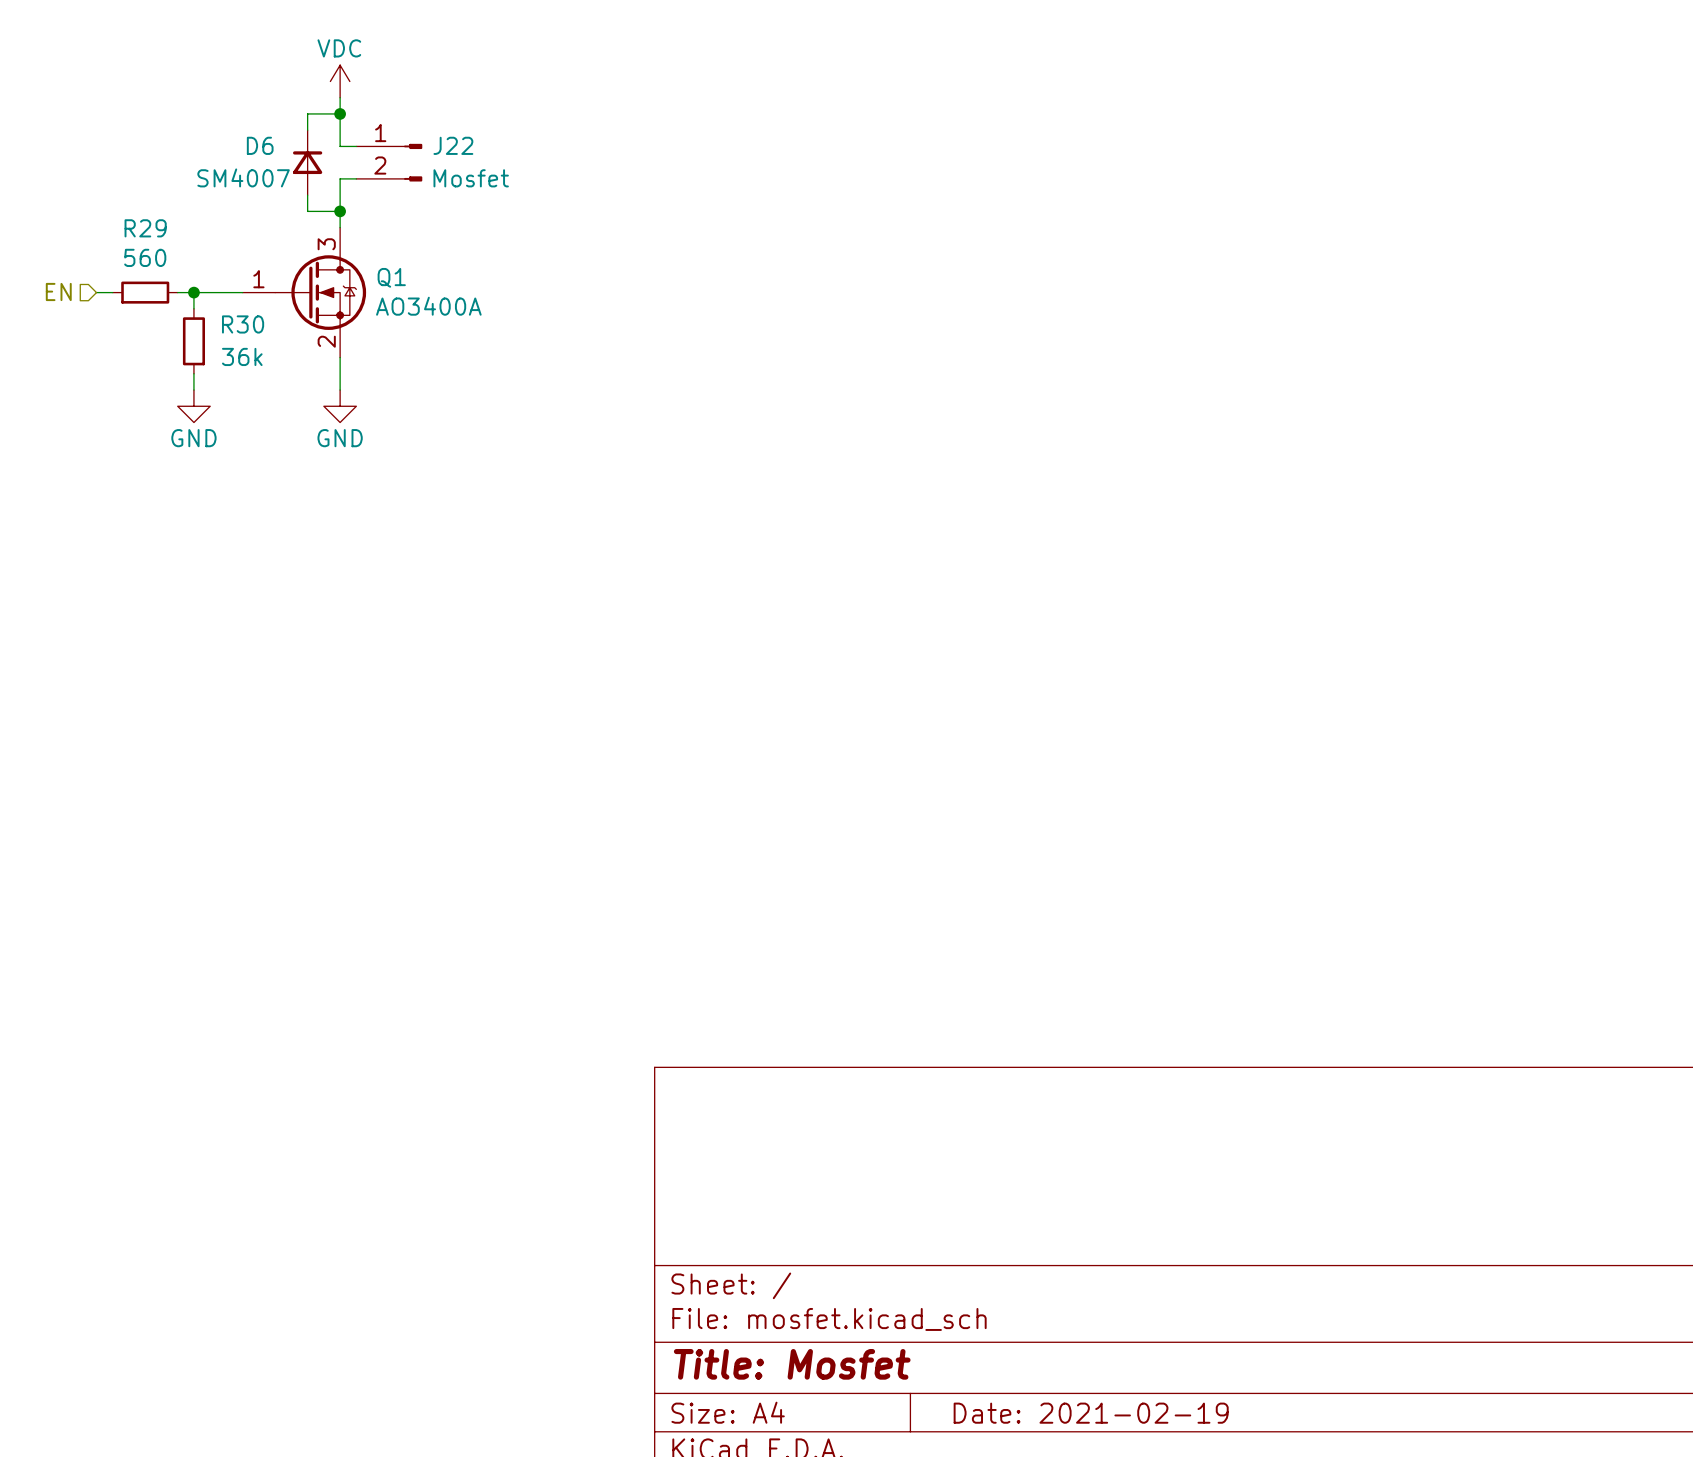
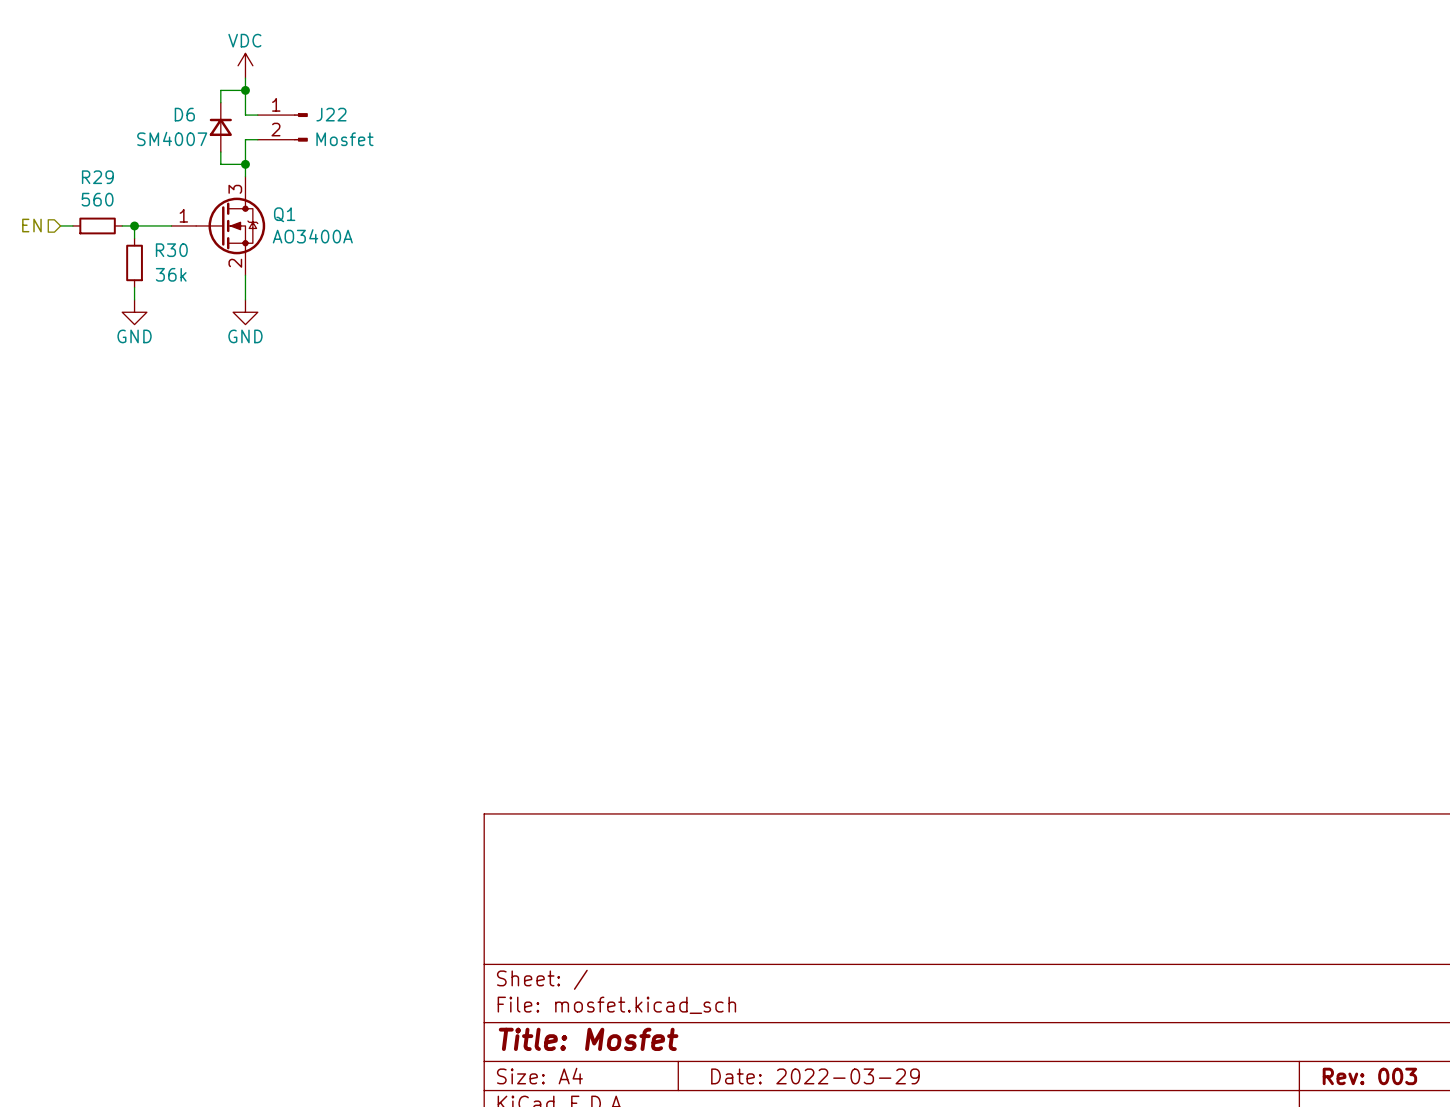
title block: Date: 2021-02-19 (1091, 1413) -> Date: 2022-03-29 (815, 1076)

